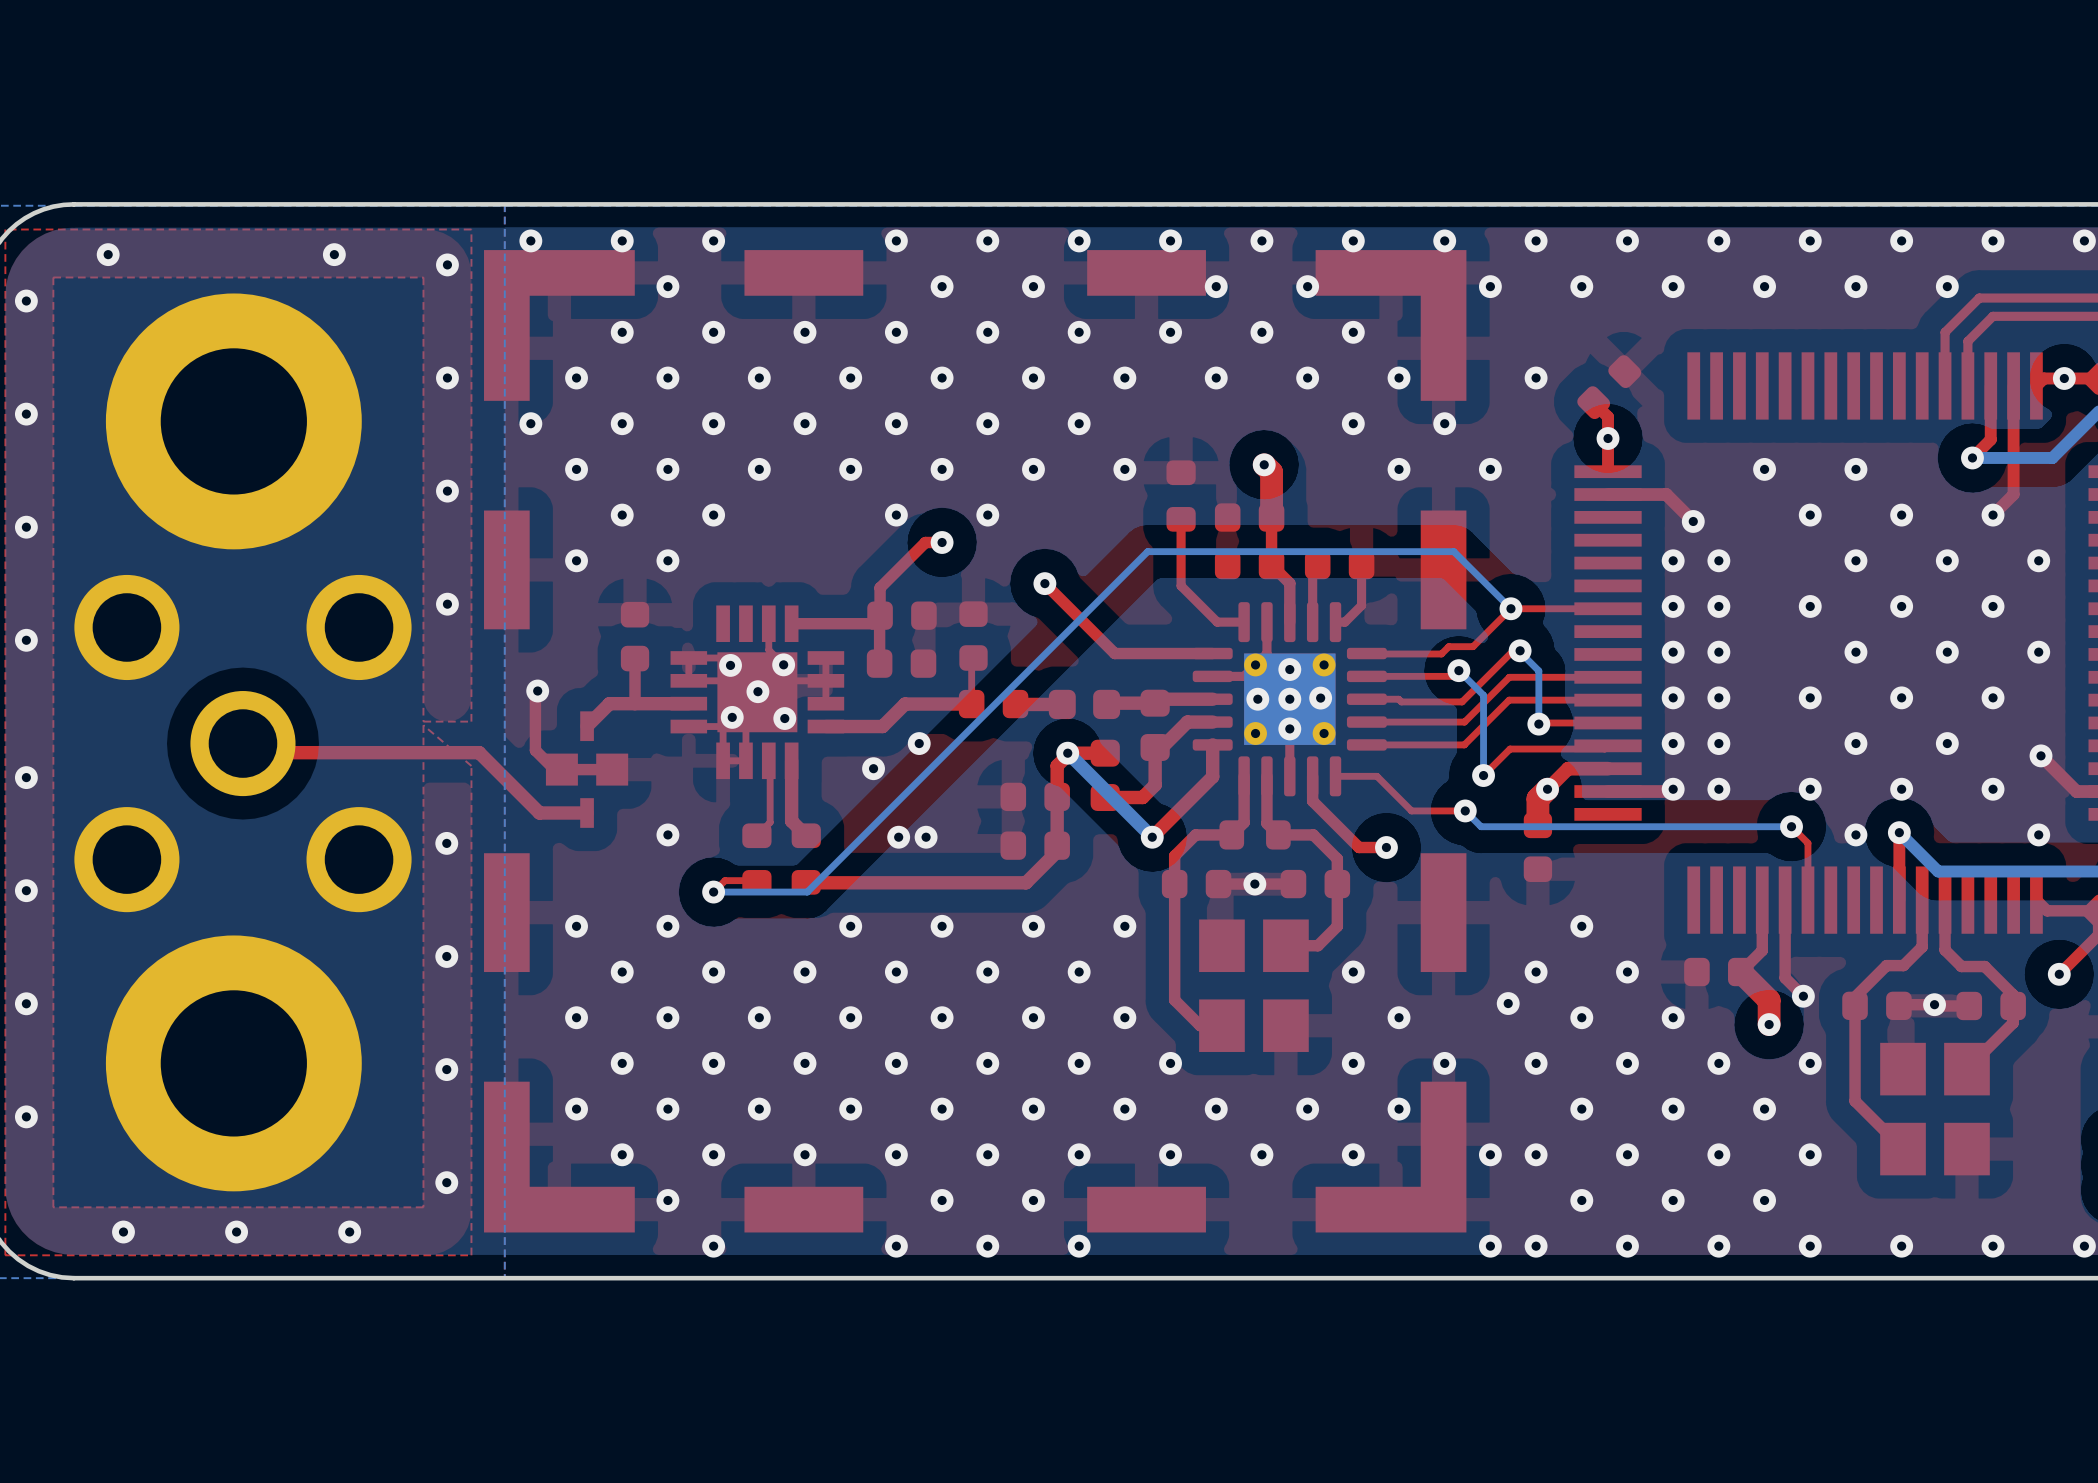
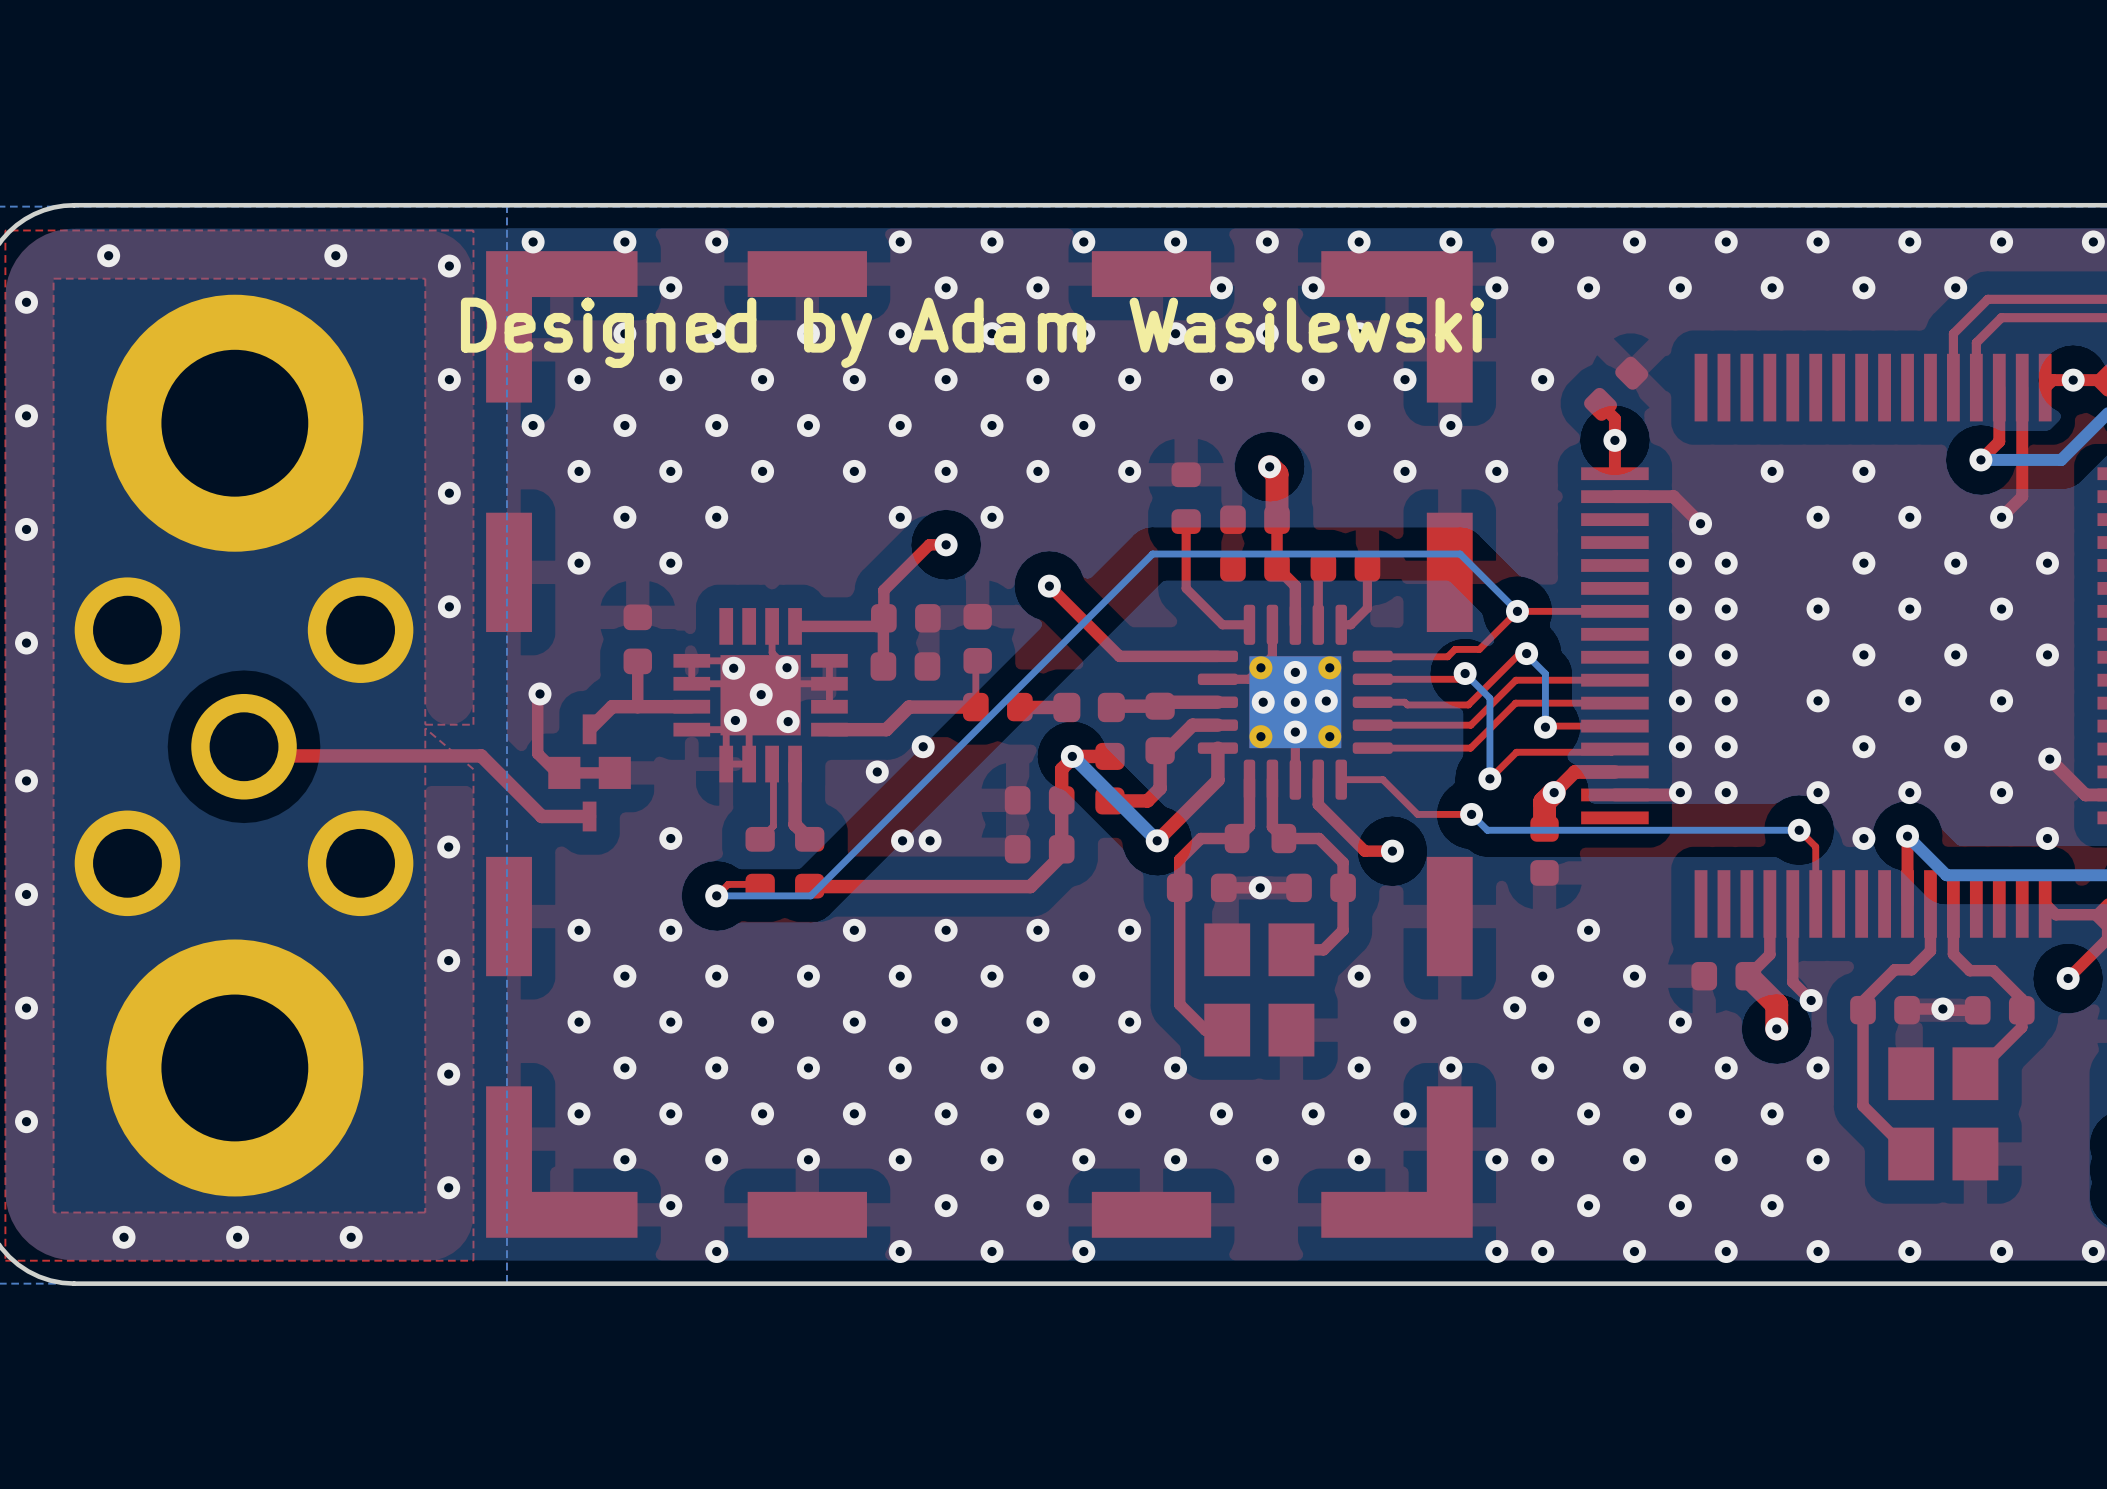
text: none -> Designed by Adam Wasilewski (972, 332)

